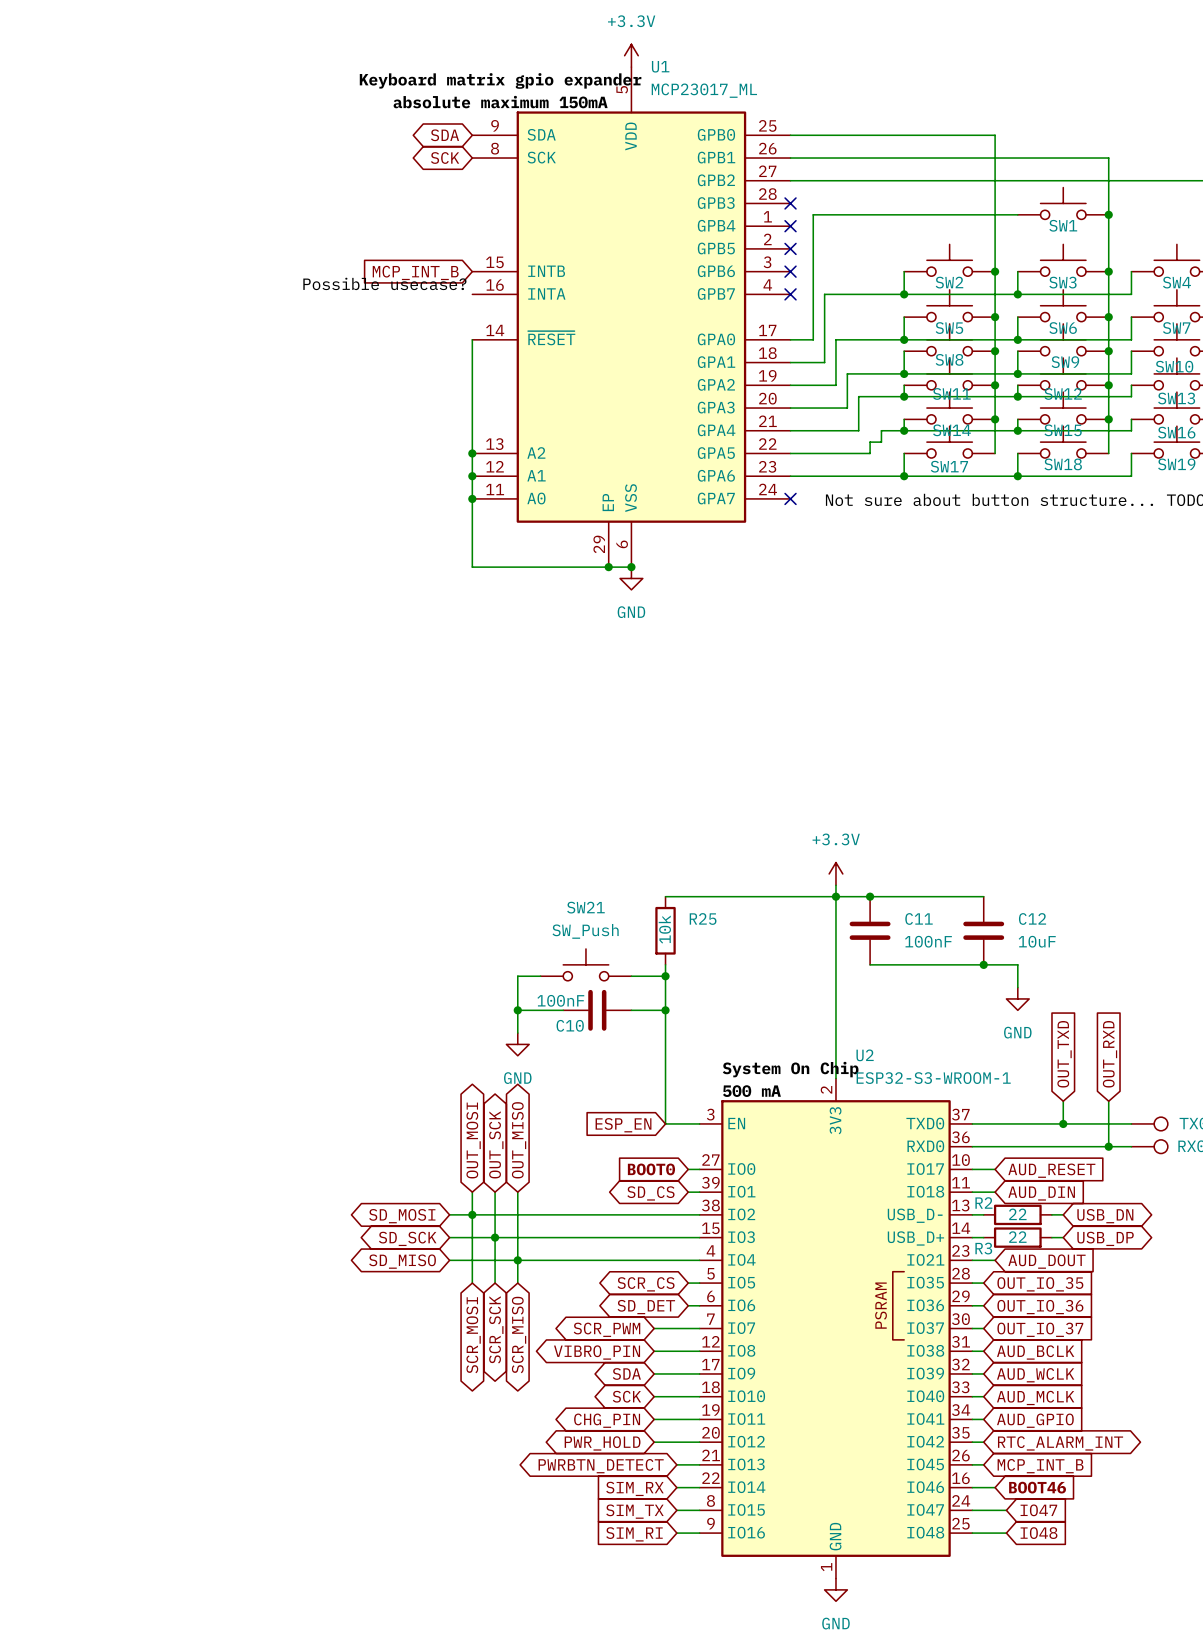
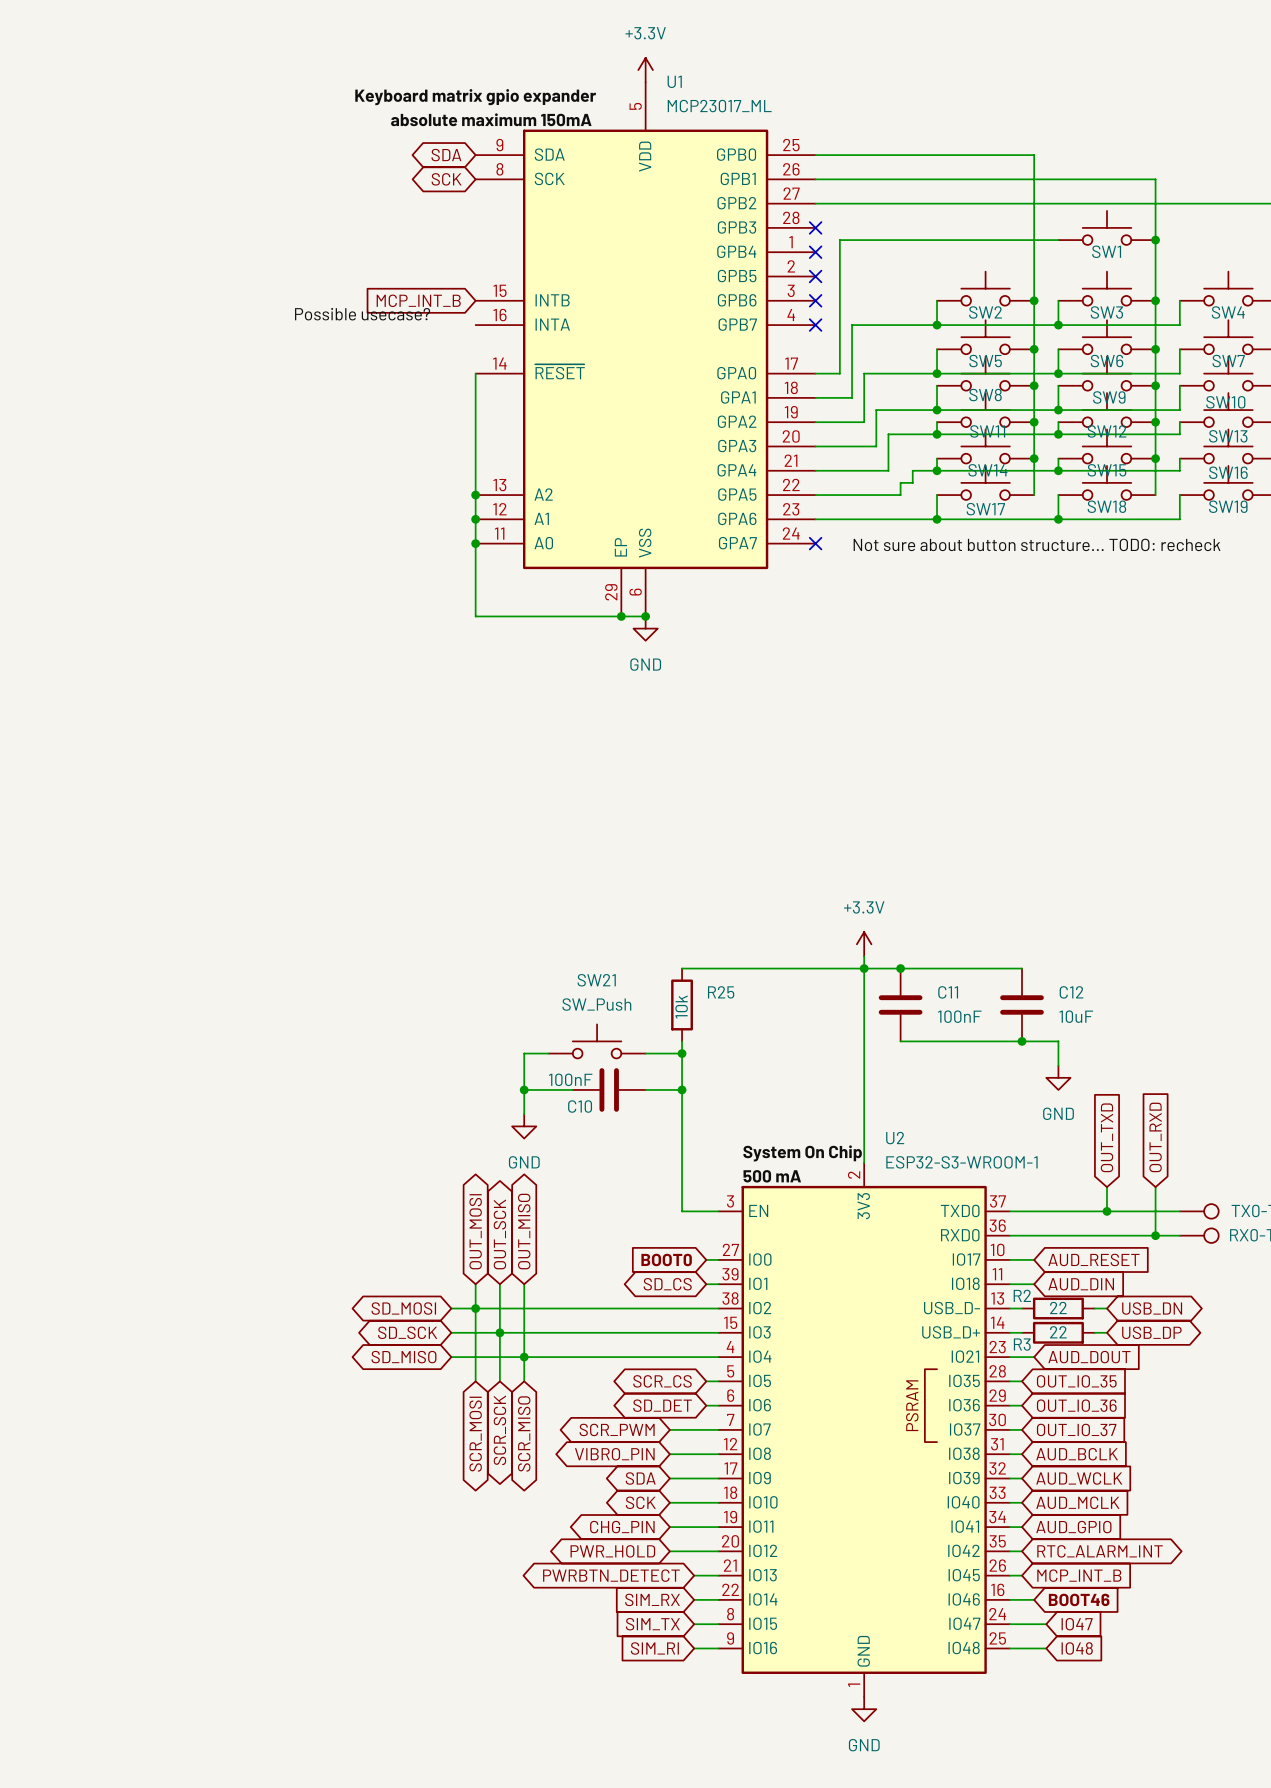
global label: ESP_EN (623, 1125) -> none

